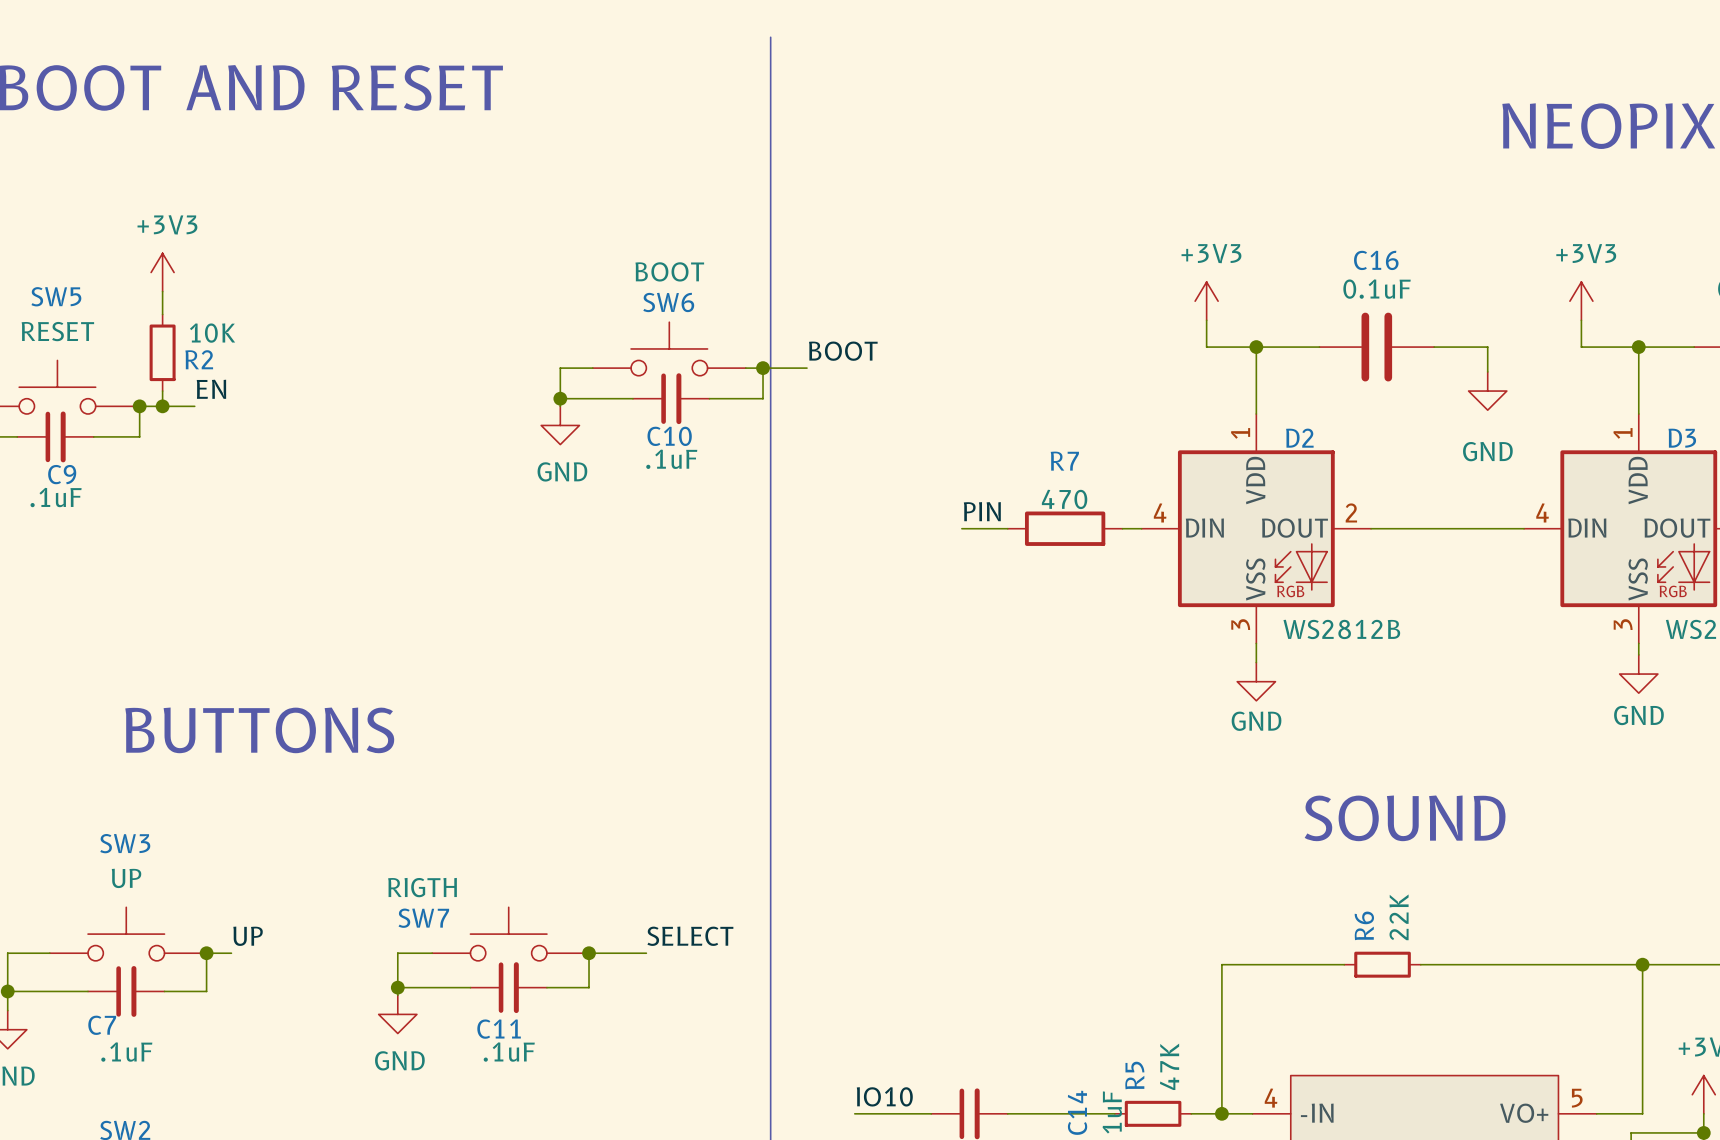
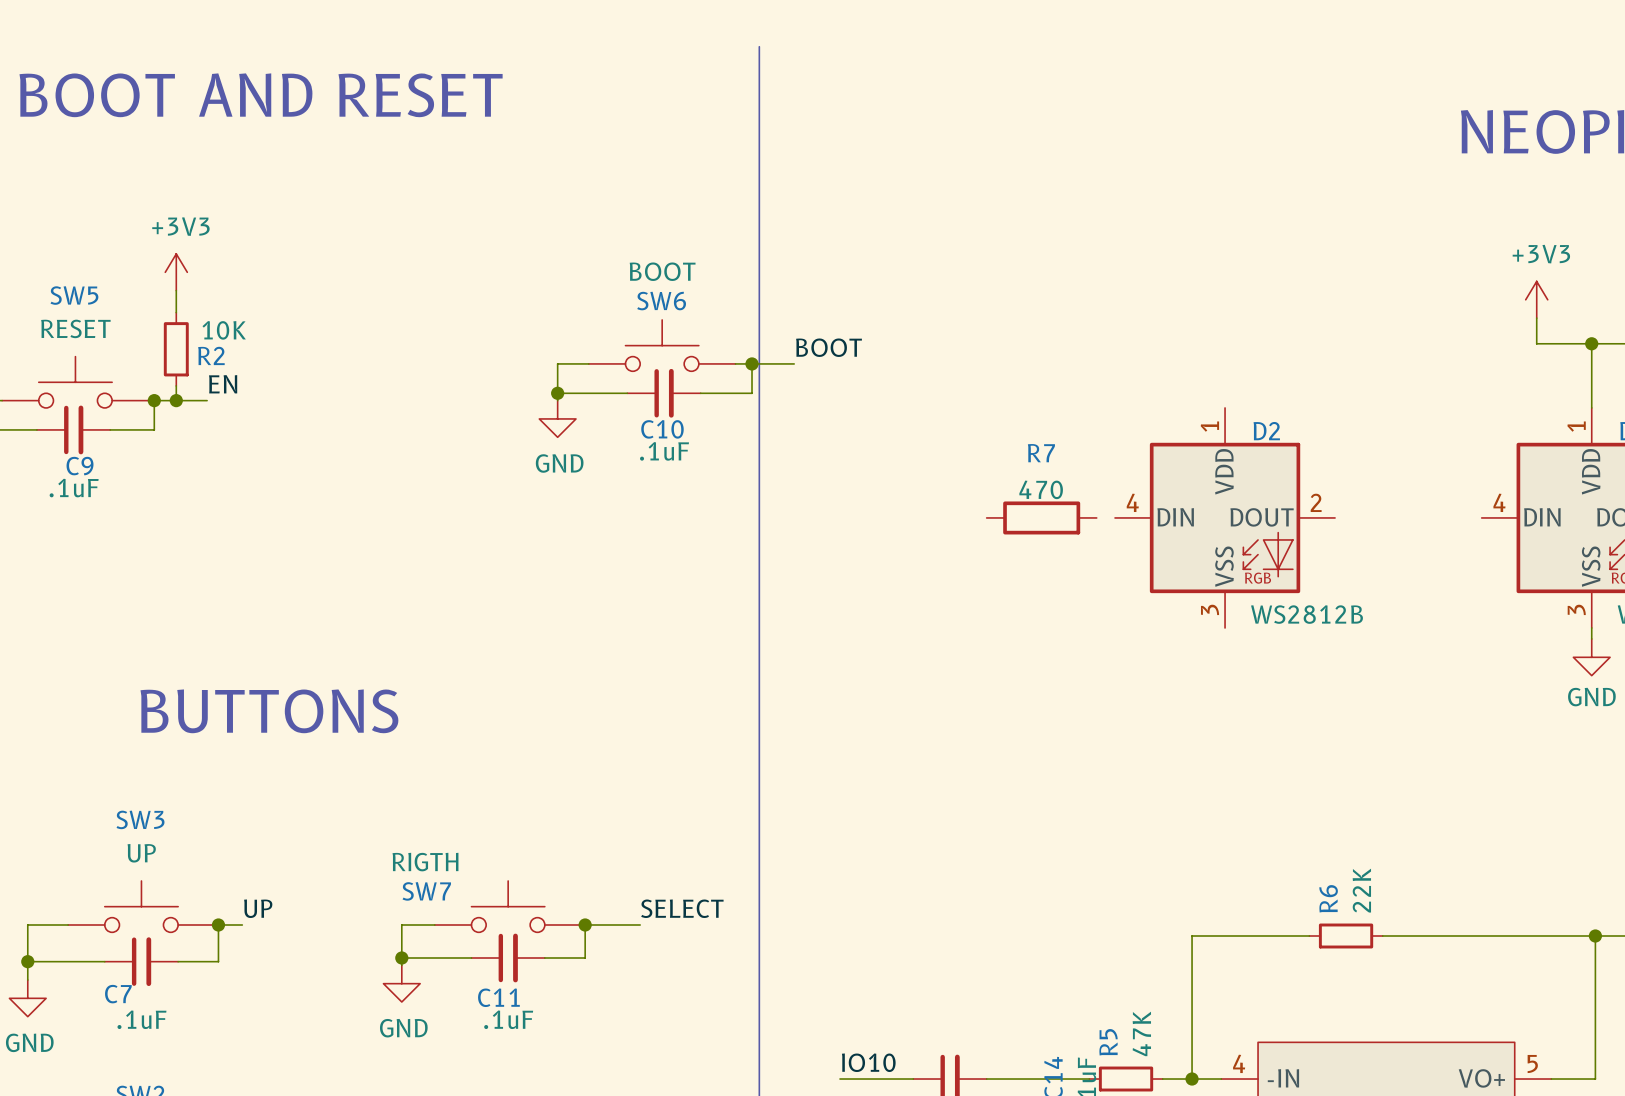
power symbol: +3V3 (1206, 301) -> none
wire: (1206, 320) (1206, 347) (1319, 347) -> none
wire: (1256, 347) (1256, 413) -> none
junction: (1256, 347) -> none
C16: 0.1uF (1376, 347) -> none
wire: (1434, 347) (1487, 347) (1487, 371) -> none
power symbol: GND (1487, 391) -> none
label: PIN (982, 511) -> none
wire: (961, 528) (1007, 528) -> none
wire: (1122, 528) (1141, 528) -> none
wire: (1371, 528) (1524, 528) -> none
wire: (1256, 643) (1256, 662) -> none
power symbol: GND (1256, 681) -> none
text: SOUND (1405, 818) -> none

